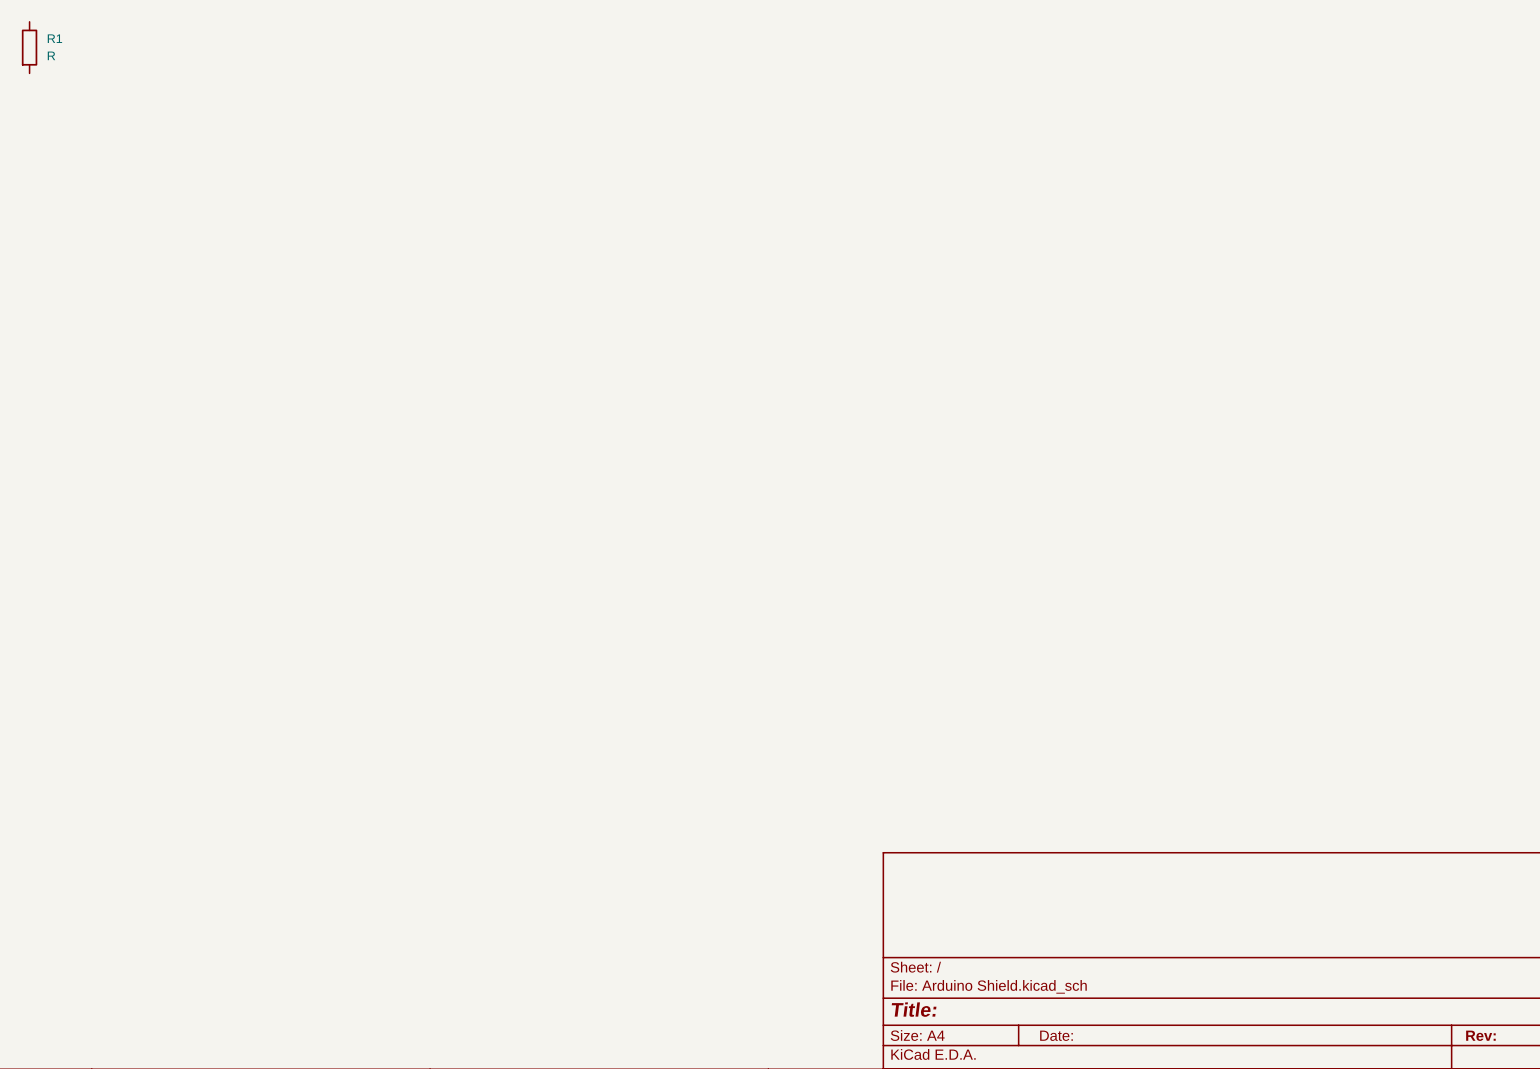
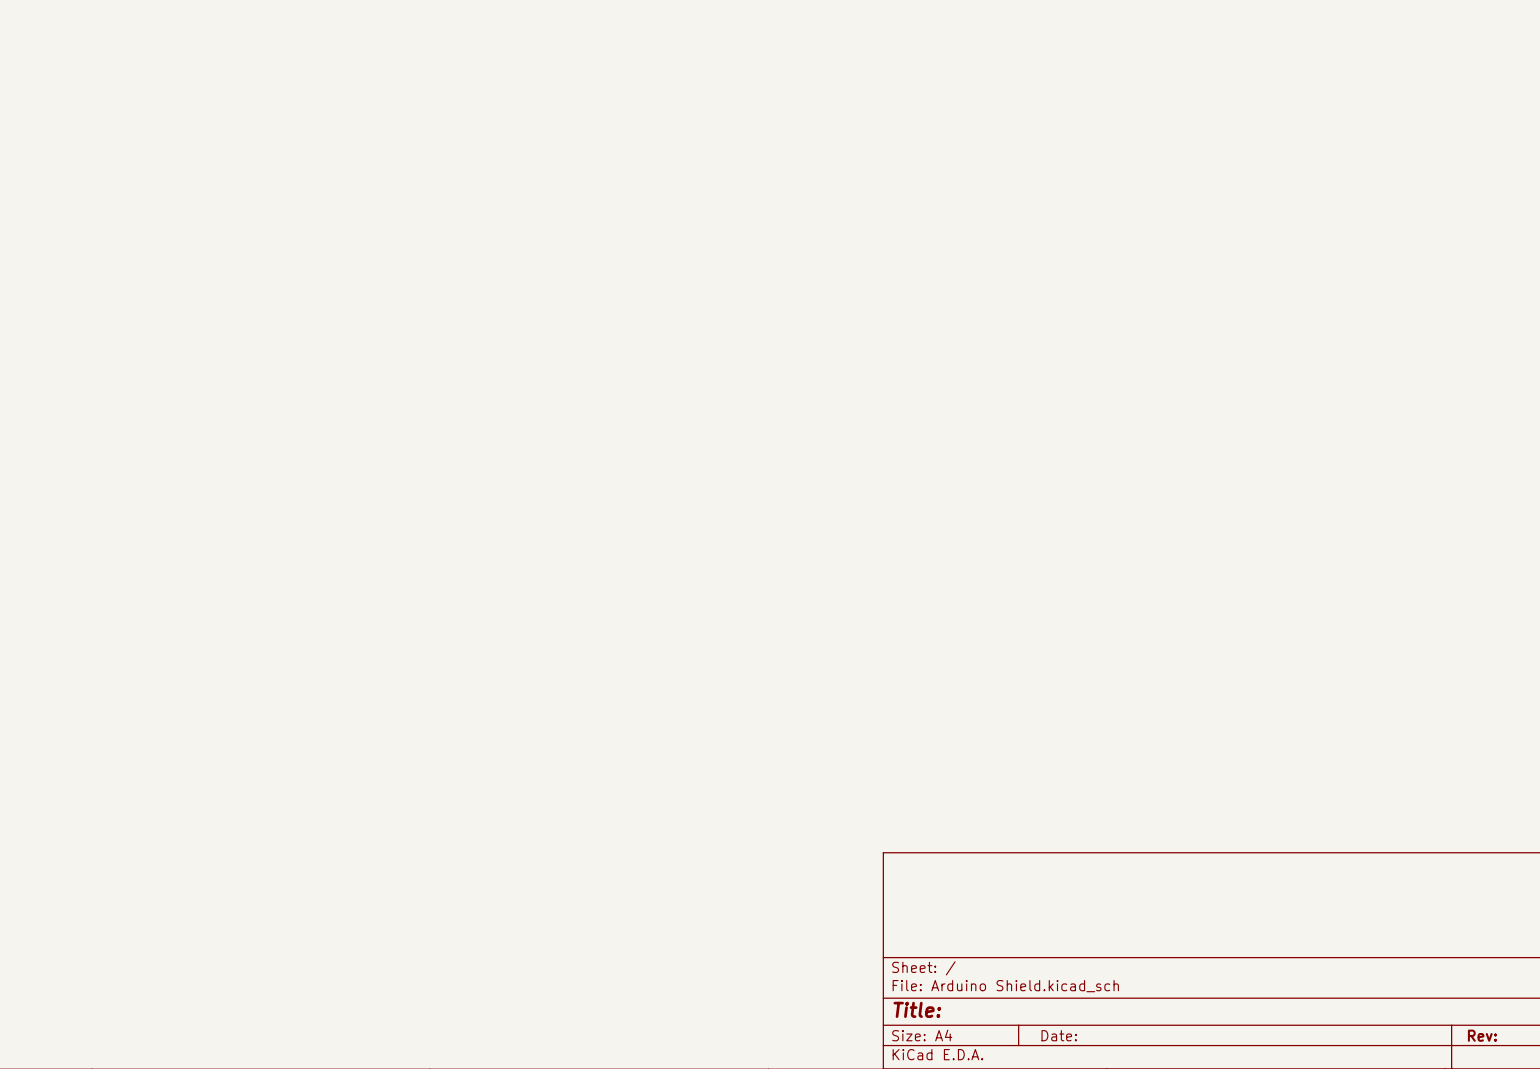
R1: R (29, 47) -> none

